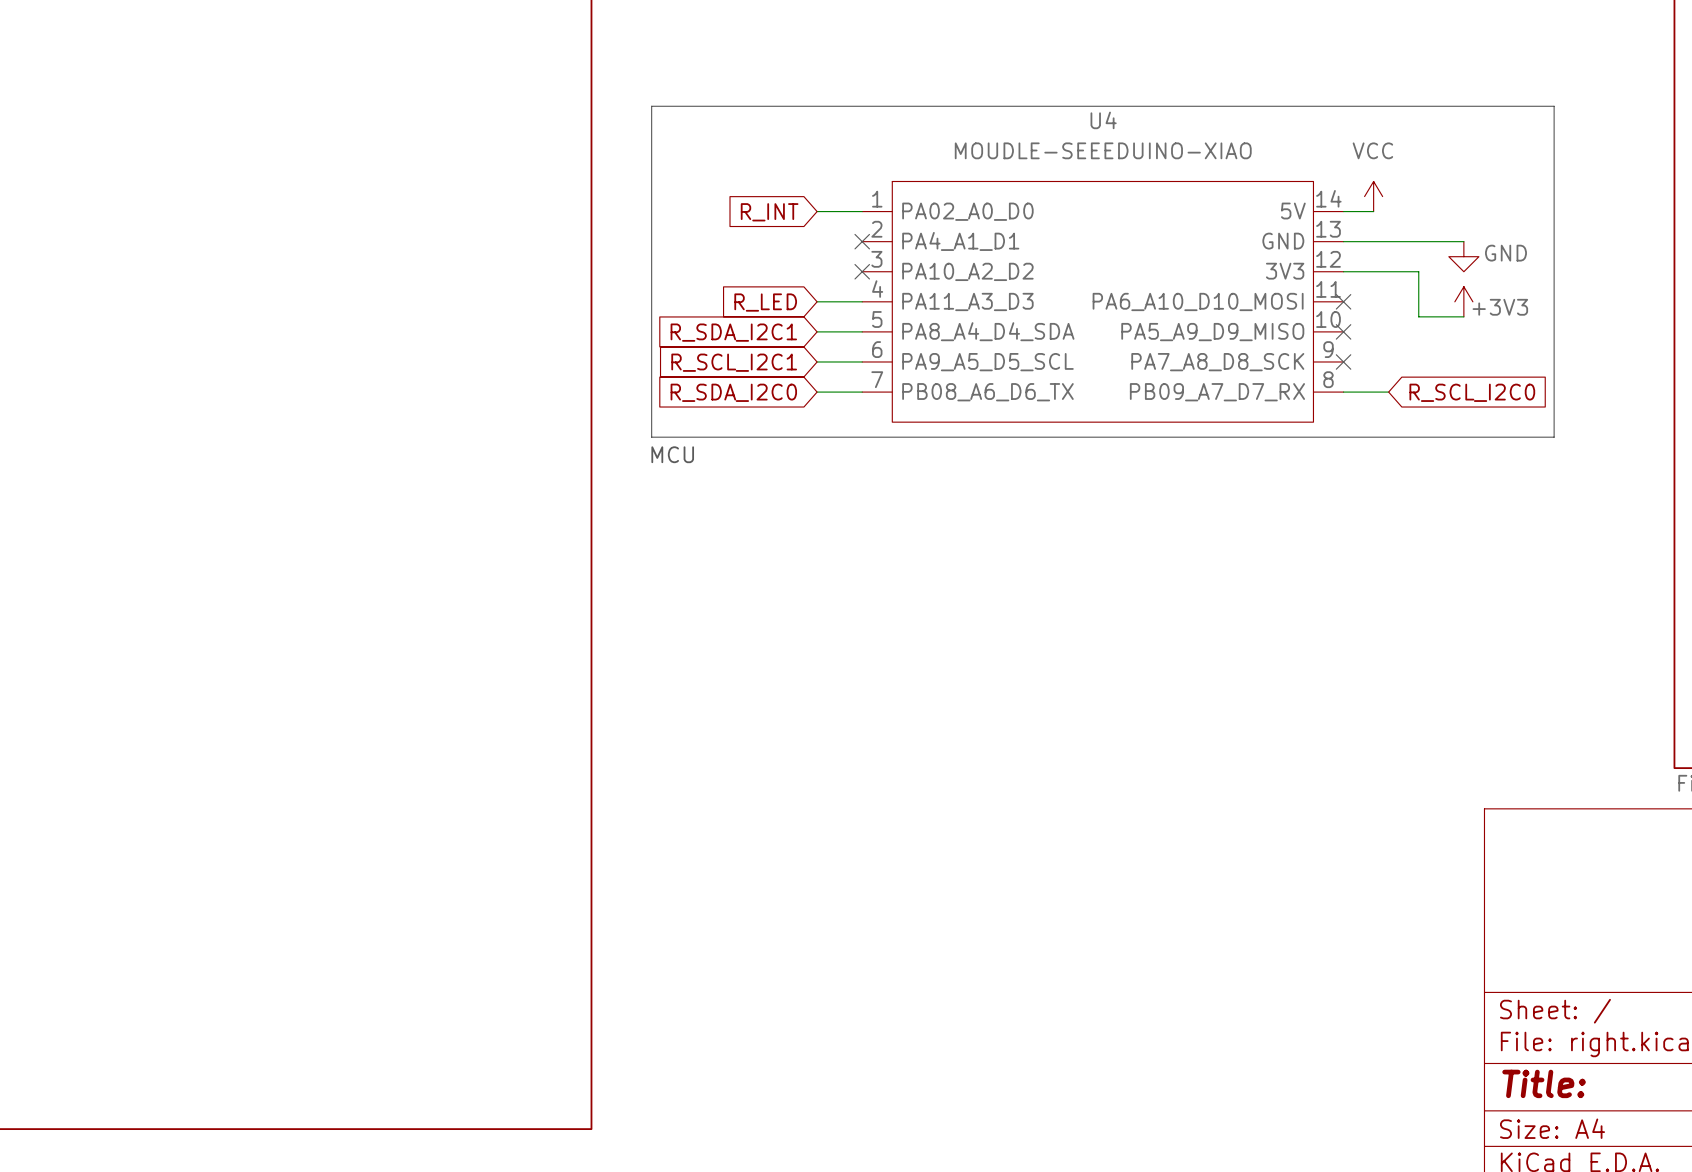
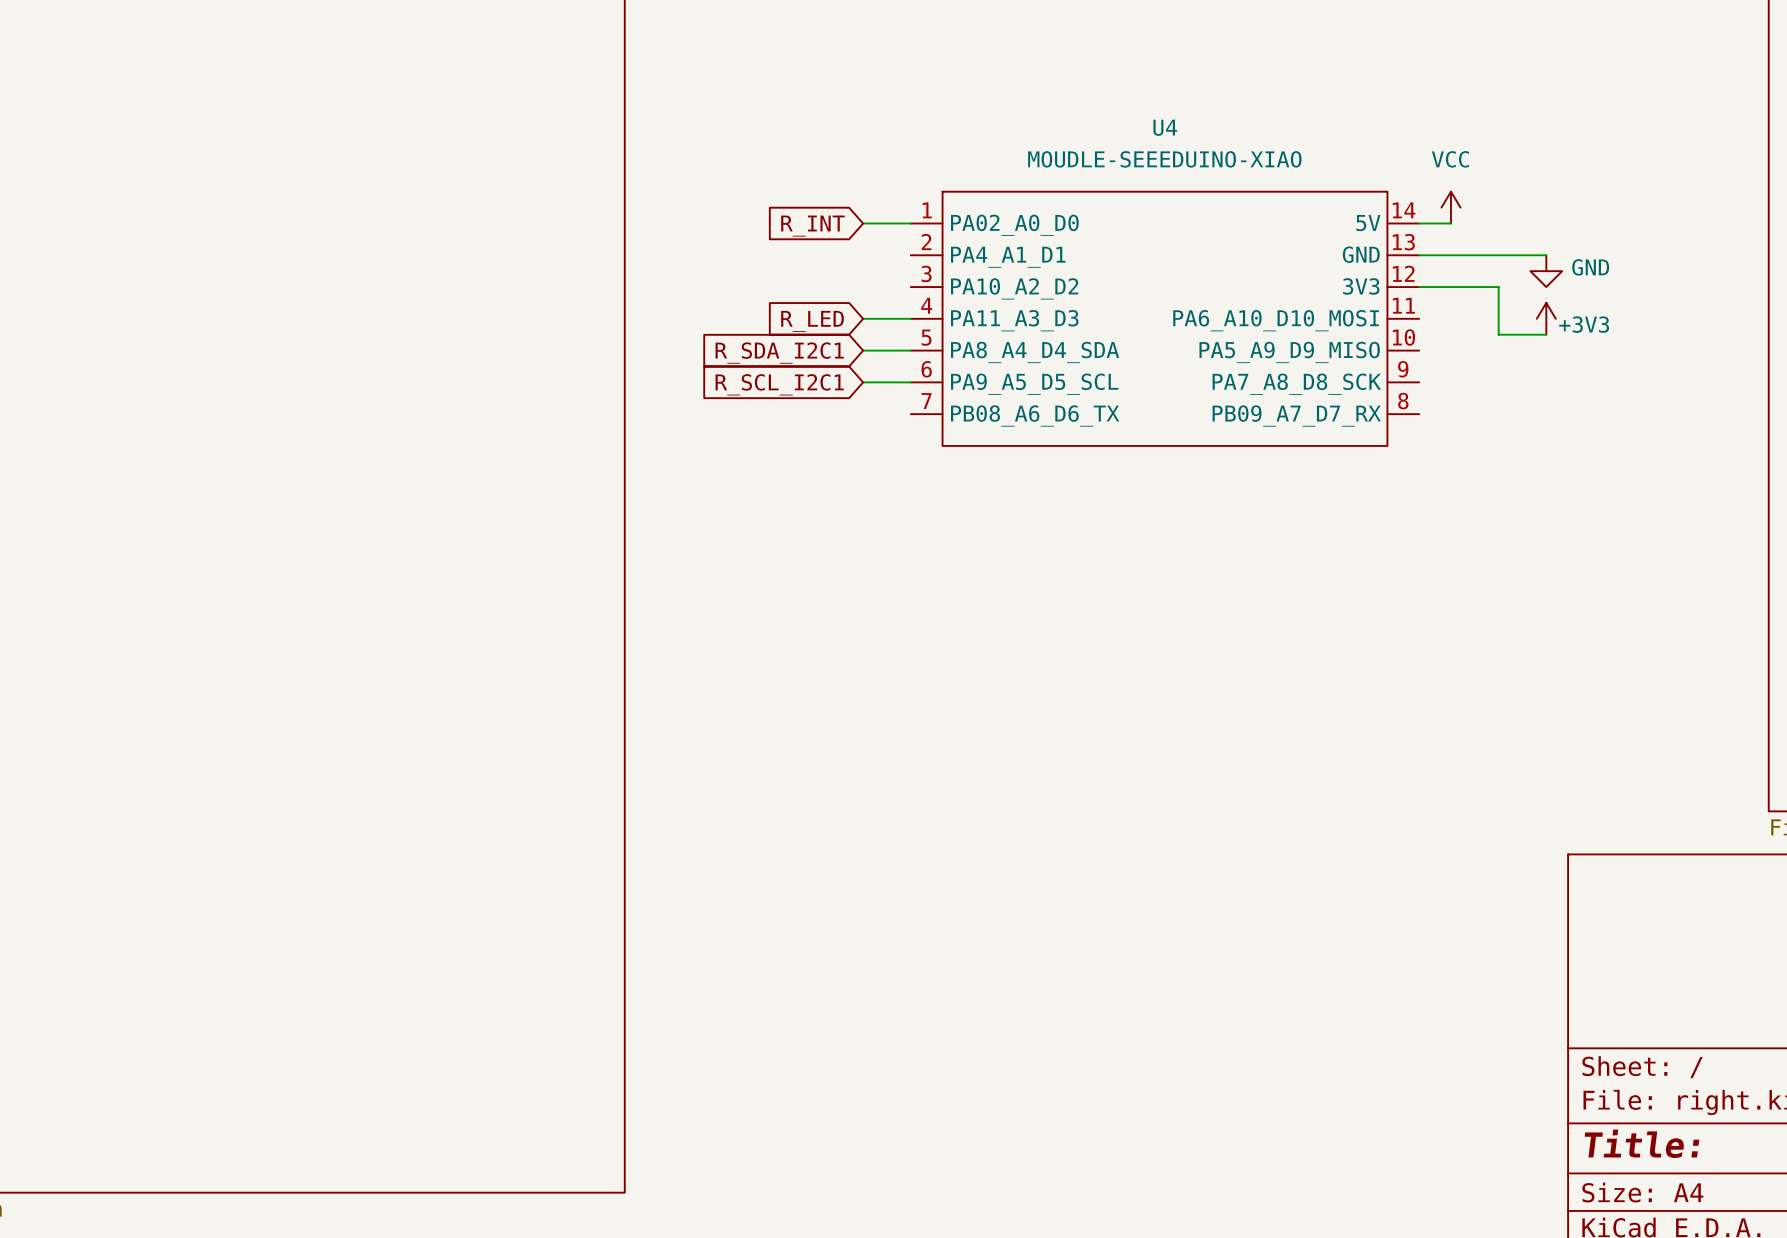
line: (651, 106) (1554, 106) (1554, 437) (651, 437) (651, 106) -> none
no-connect mark: (862, 241) -> none
no-connect mark: (862, 271) -> none
no-connect mark: (1343, 301) -> none
no-connect mark: (1343, 331) -> none
no-connect mark: (1343, 361) -> none
global label: R_SDA_I2C0 (733, 392) -> none
wire: (817, 392) (862, 392) -> none
wire: (1343, 392) (1388, 392) -> none
global label: R_SCL_I2C0 (1472, 392) -> none
text: MCU (672, 454) -> none

